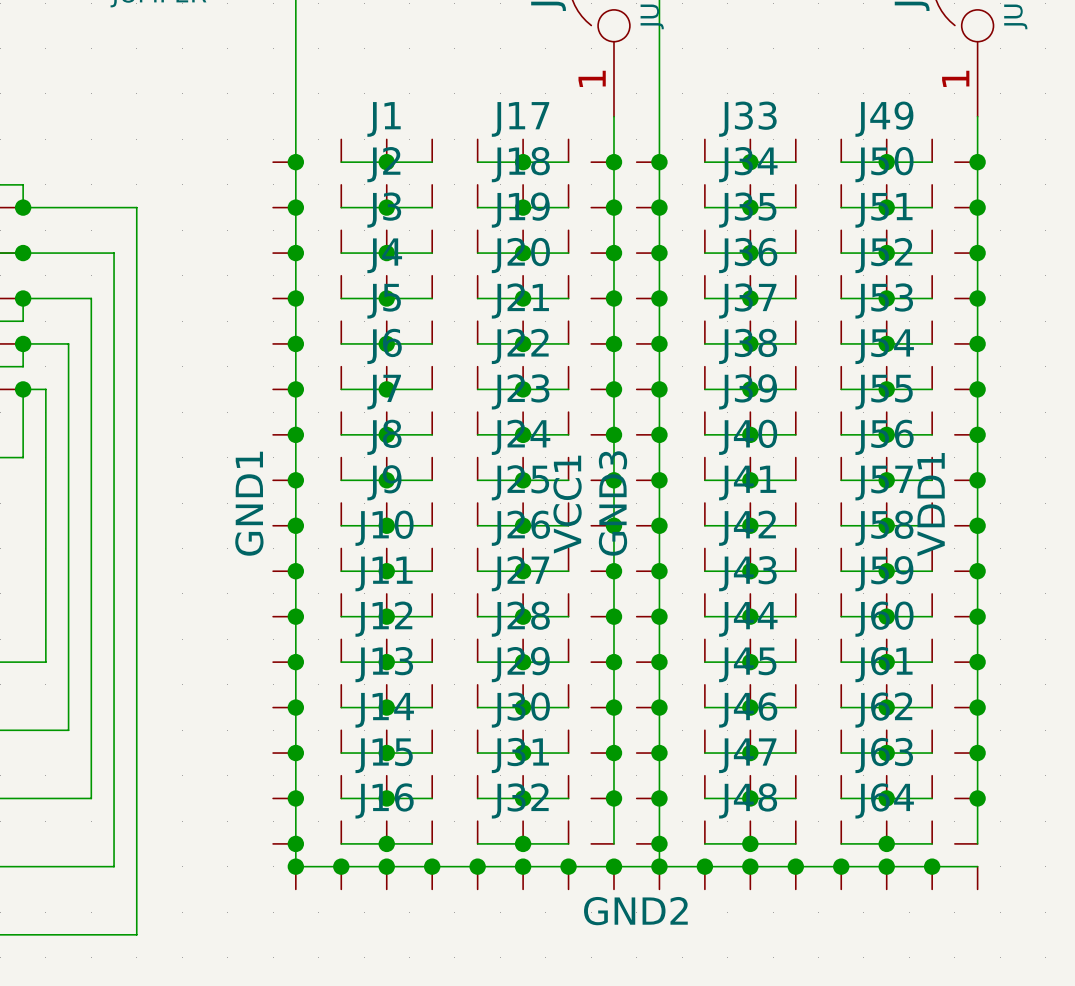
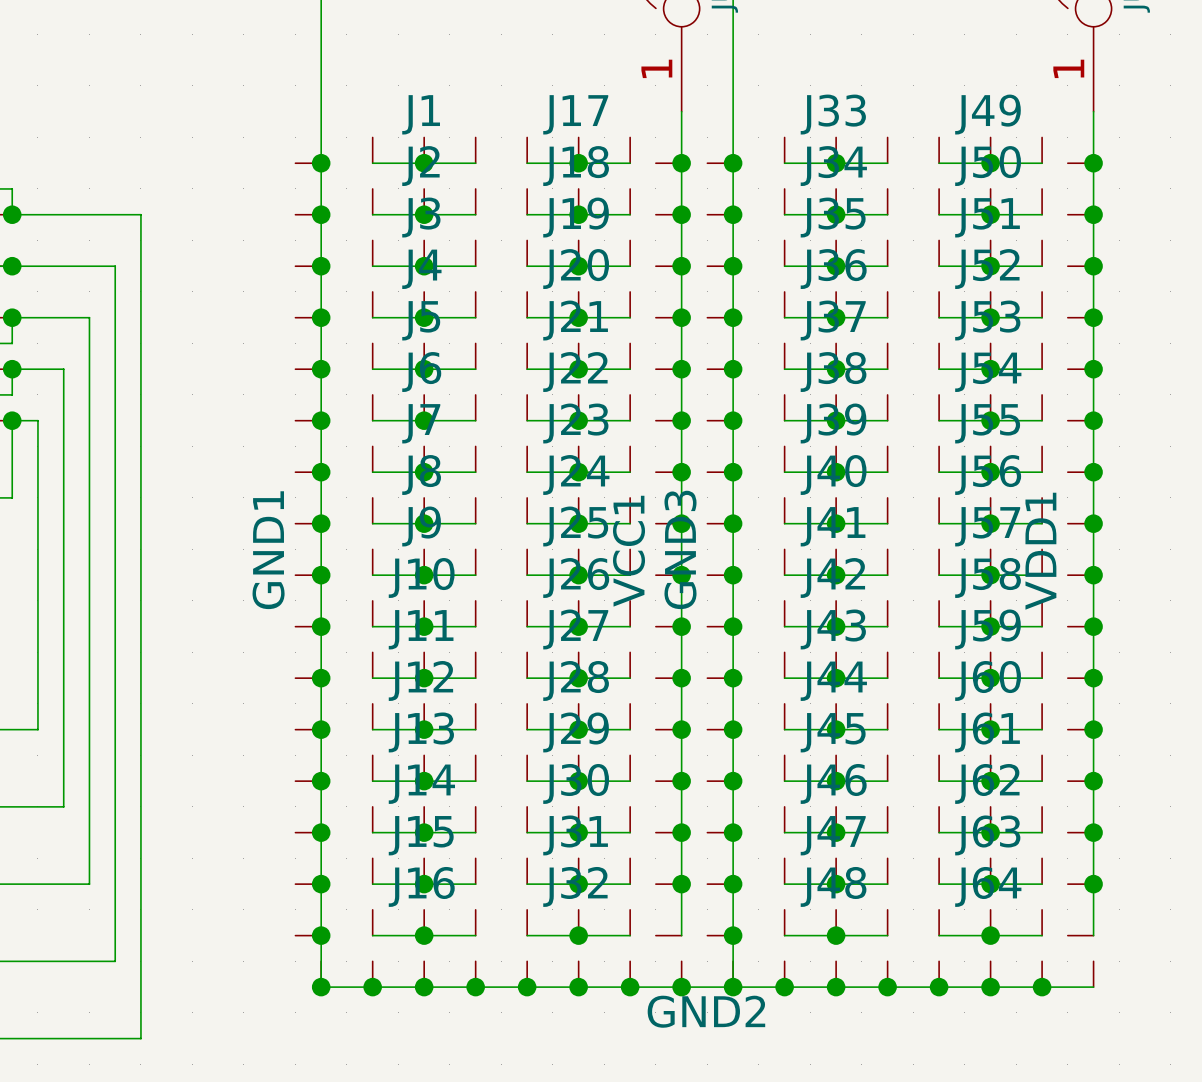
wire: (295, 866) (977, 866) -> (321, 961) (321, 987) (1093, 987)
junction position: (295, 866) -> (321, 987)
junction position: (341, 866) -> (372, 987)
junction position: (386, 866) -> (424, 987)
junction position: (432, 866) -> (475, 987)
junction position: (477, 866) -> (527, 987)
junction position: (523, 866) -> (578, 987)
junction position: (568, 866) -> (630, 987)
junction position: (613, 866) -> (681, 987)
junction position: (659, 866) -> (733, 987)
junction position: (704, 866) -> (784, 987)
junction position: (750, 866) -> (836, 987)
junction position: (795, 866) -> (887, 987)
junction position: (841, 866) -> (939, 987)
junction position: (886, 866) -> (990, 987)
junction position: (932, 866) -> (1042, 987)

